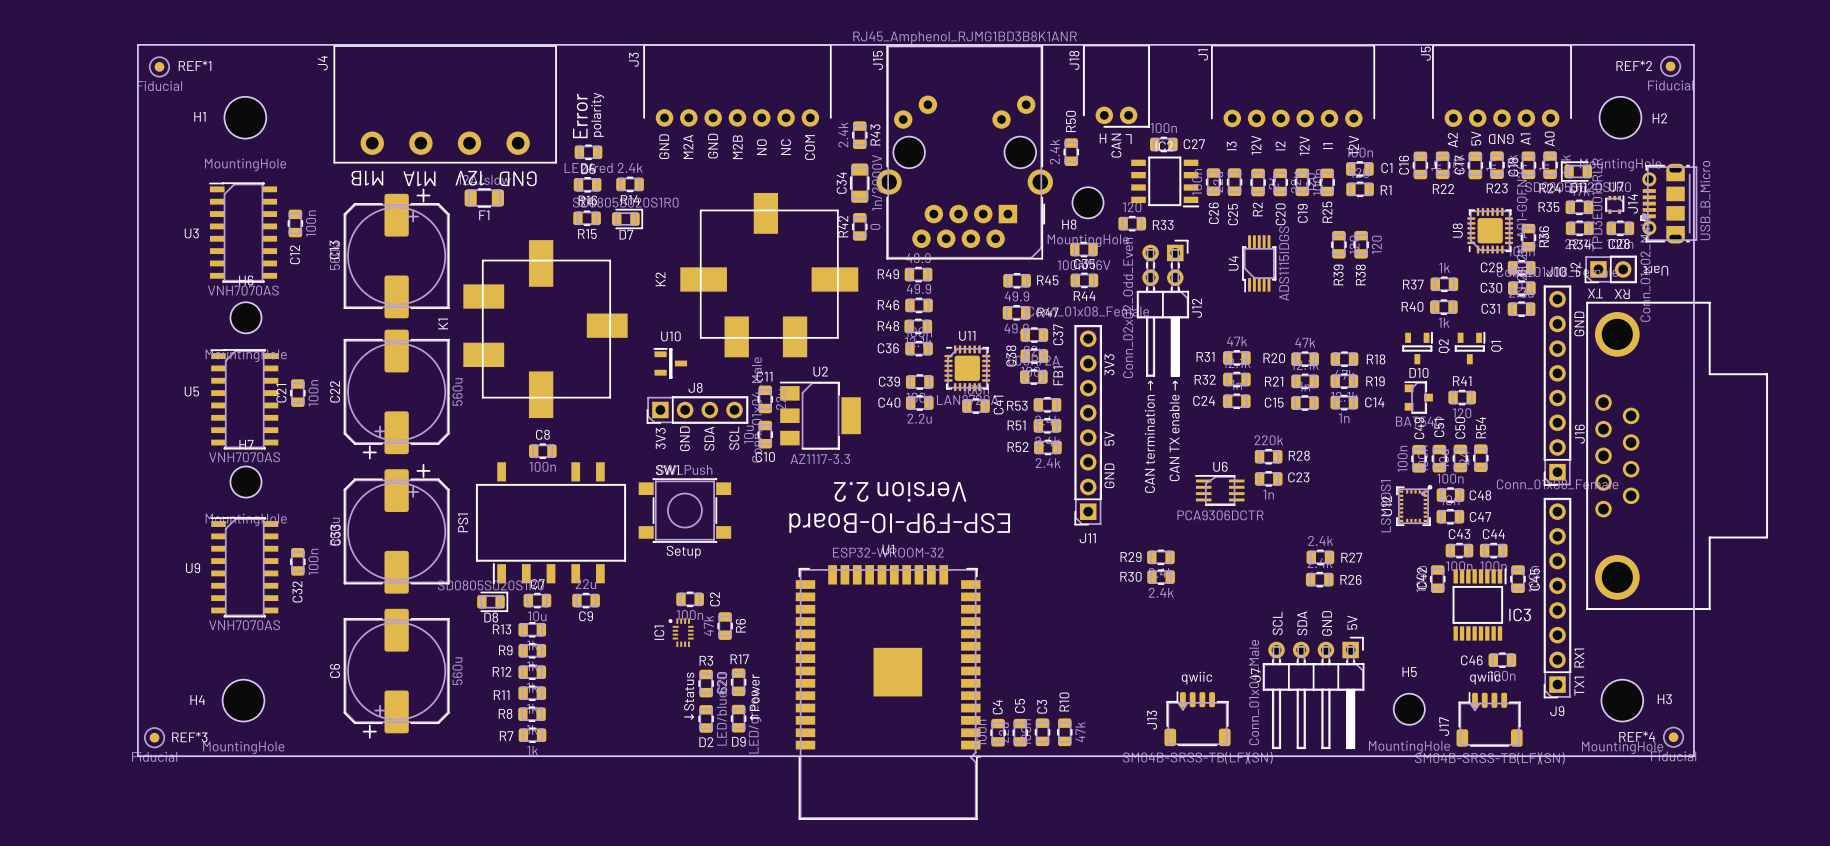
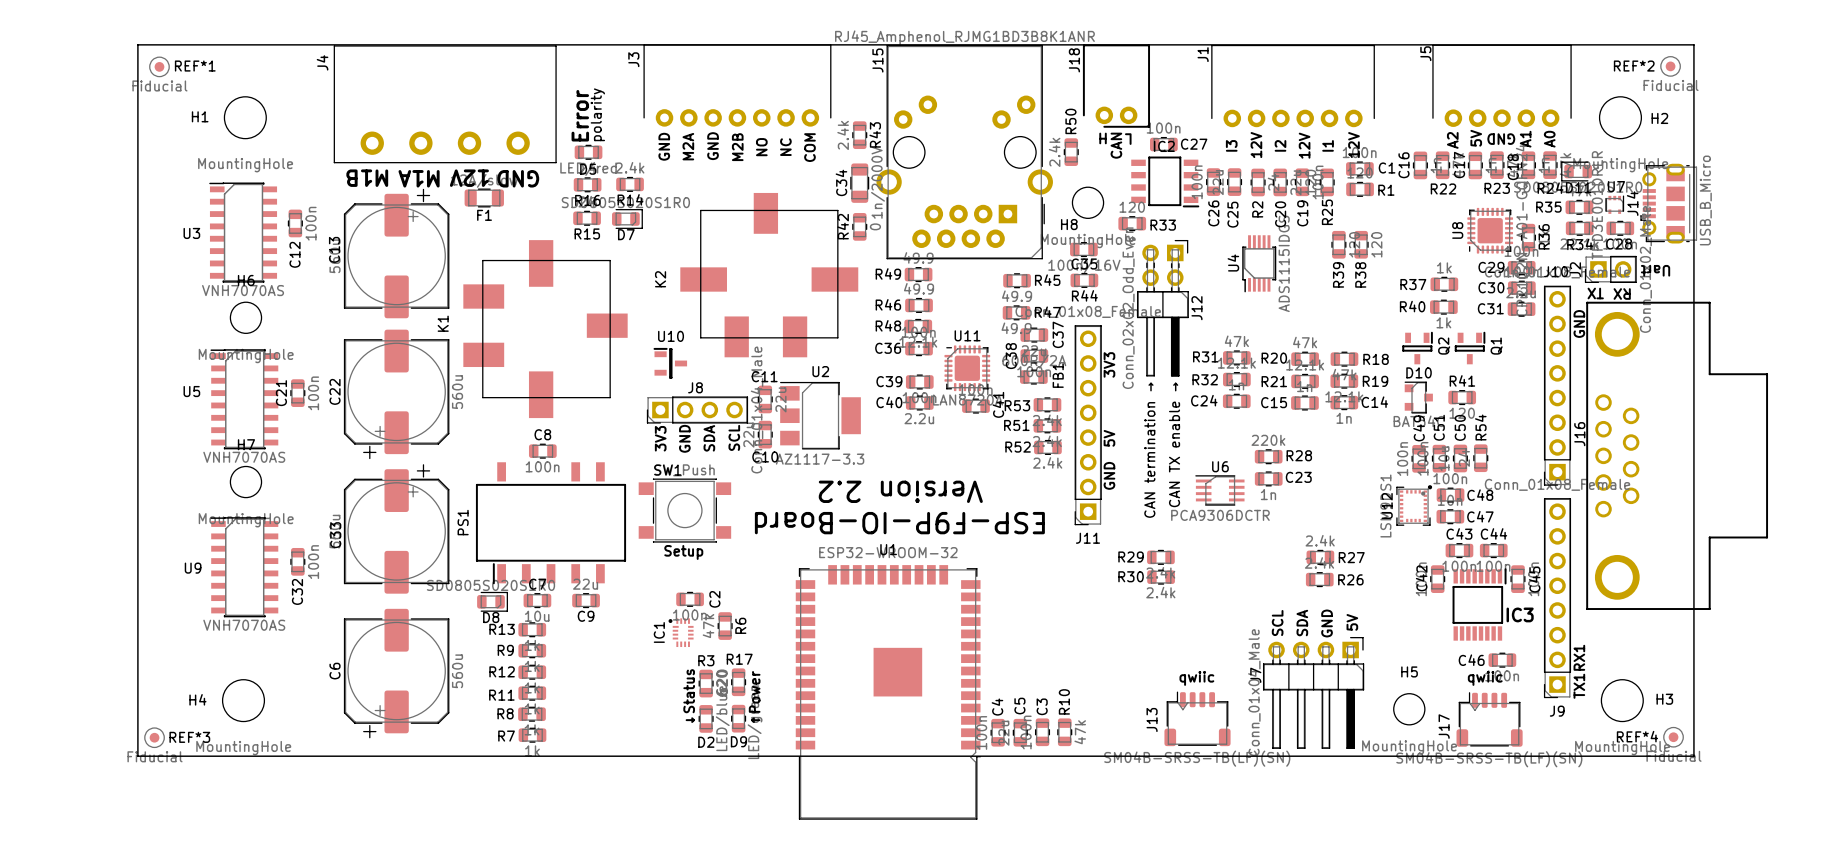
C10 value: 10u (748, 434) -> 22u (748, 435)

